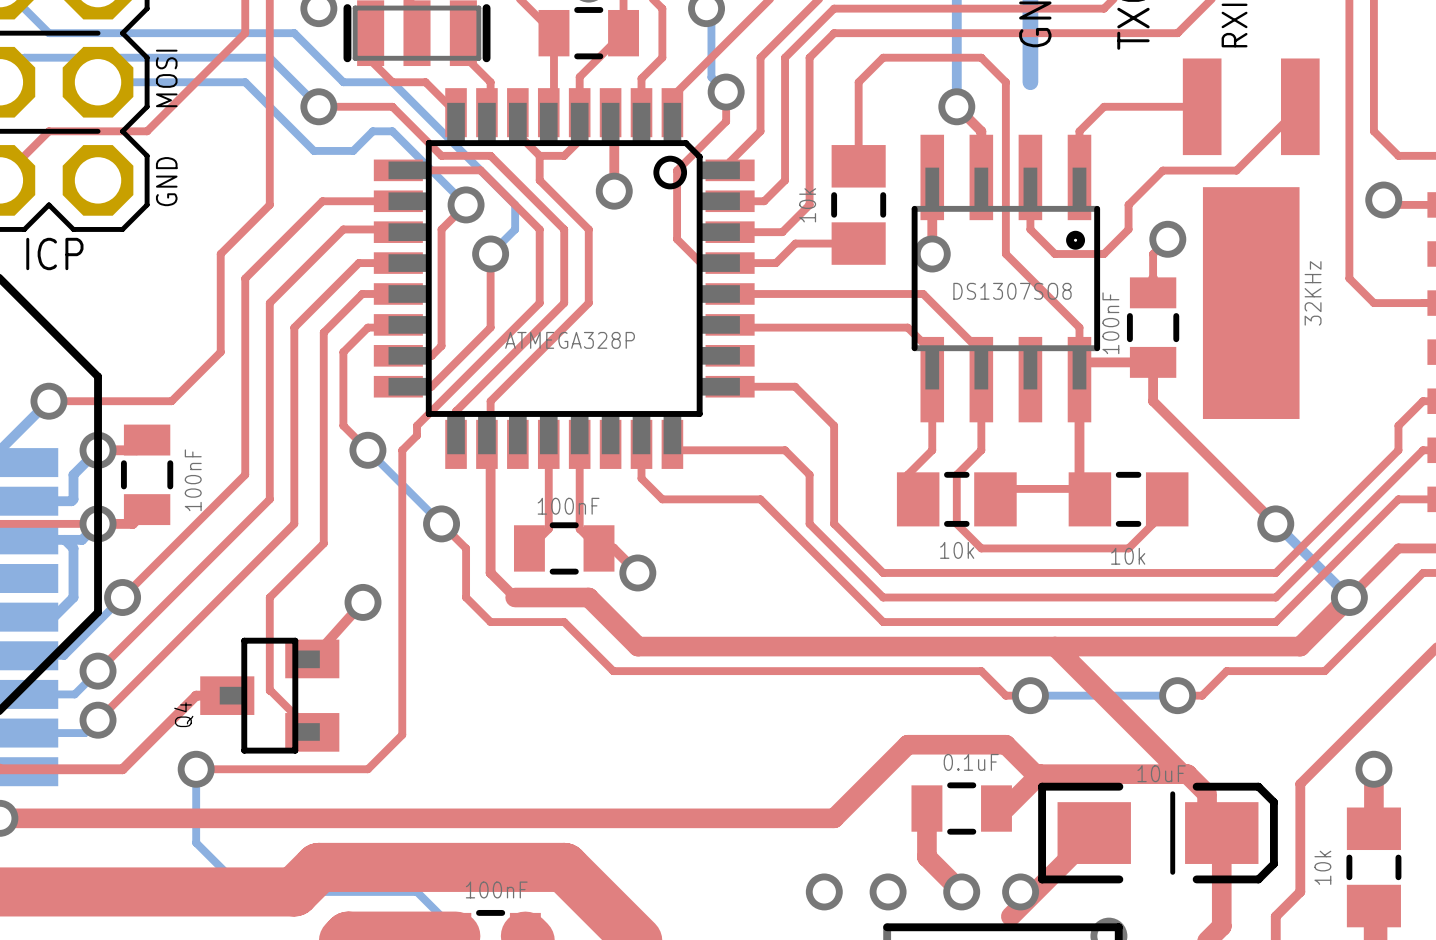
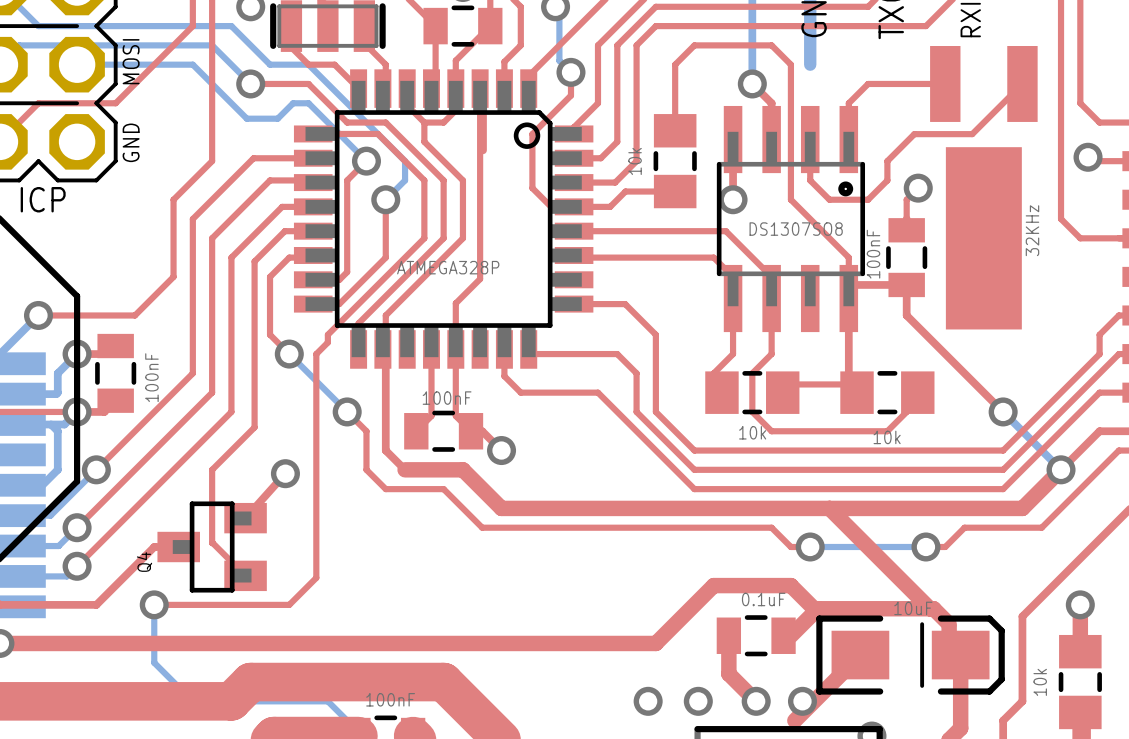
via: (614, 191) -> none
top track: (579, 444) (579, 529) -> (480, 88) (480, 279) (455, 303) (455, 416)

